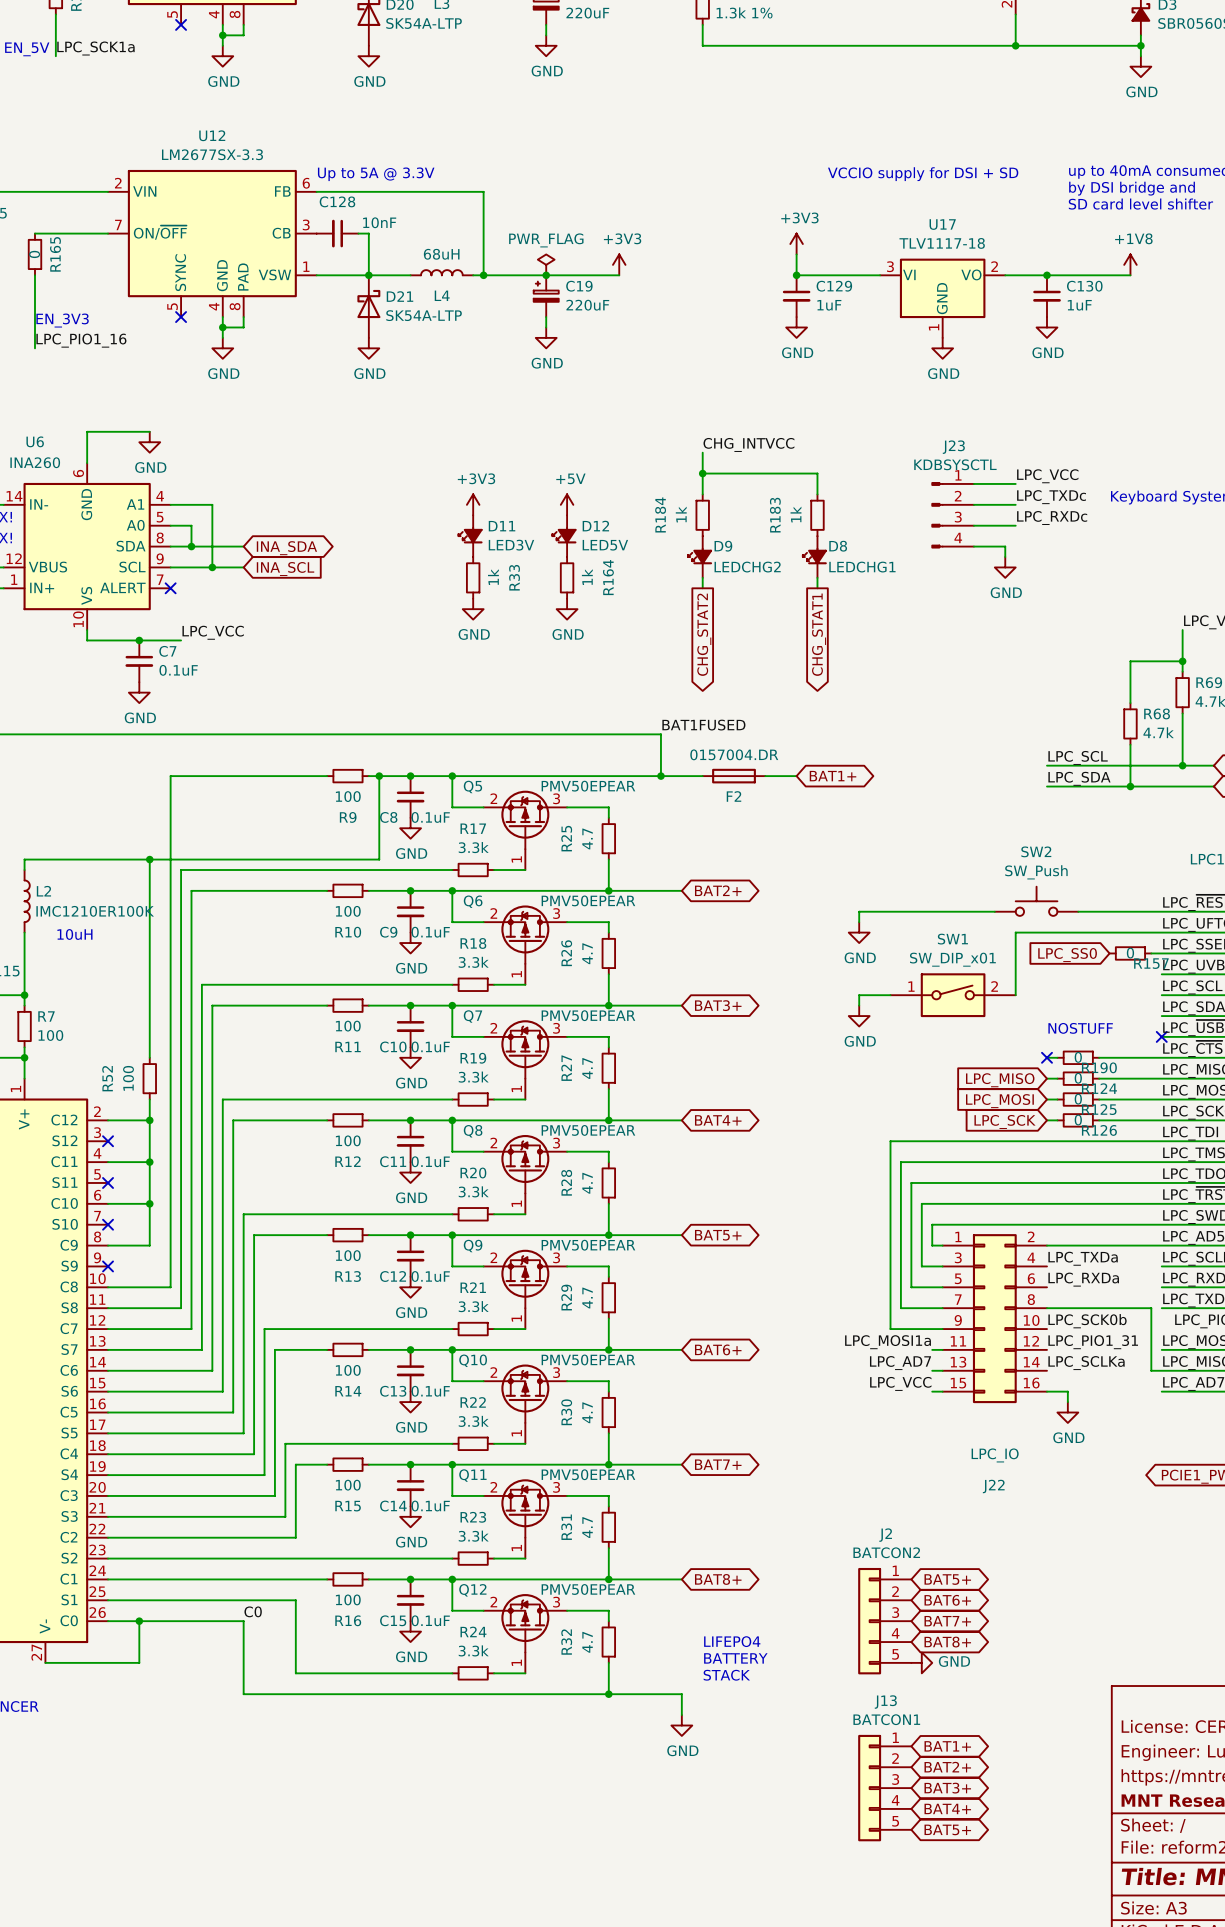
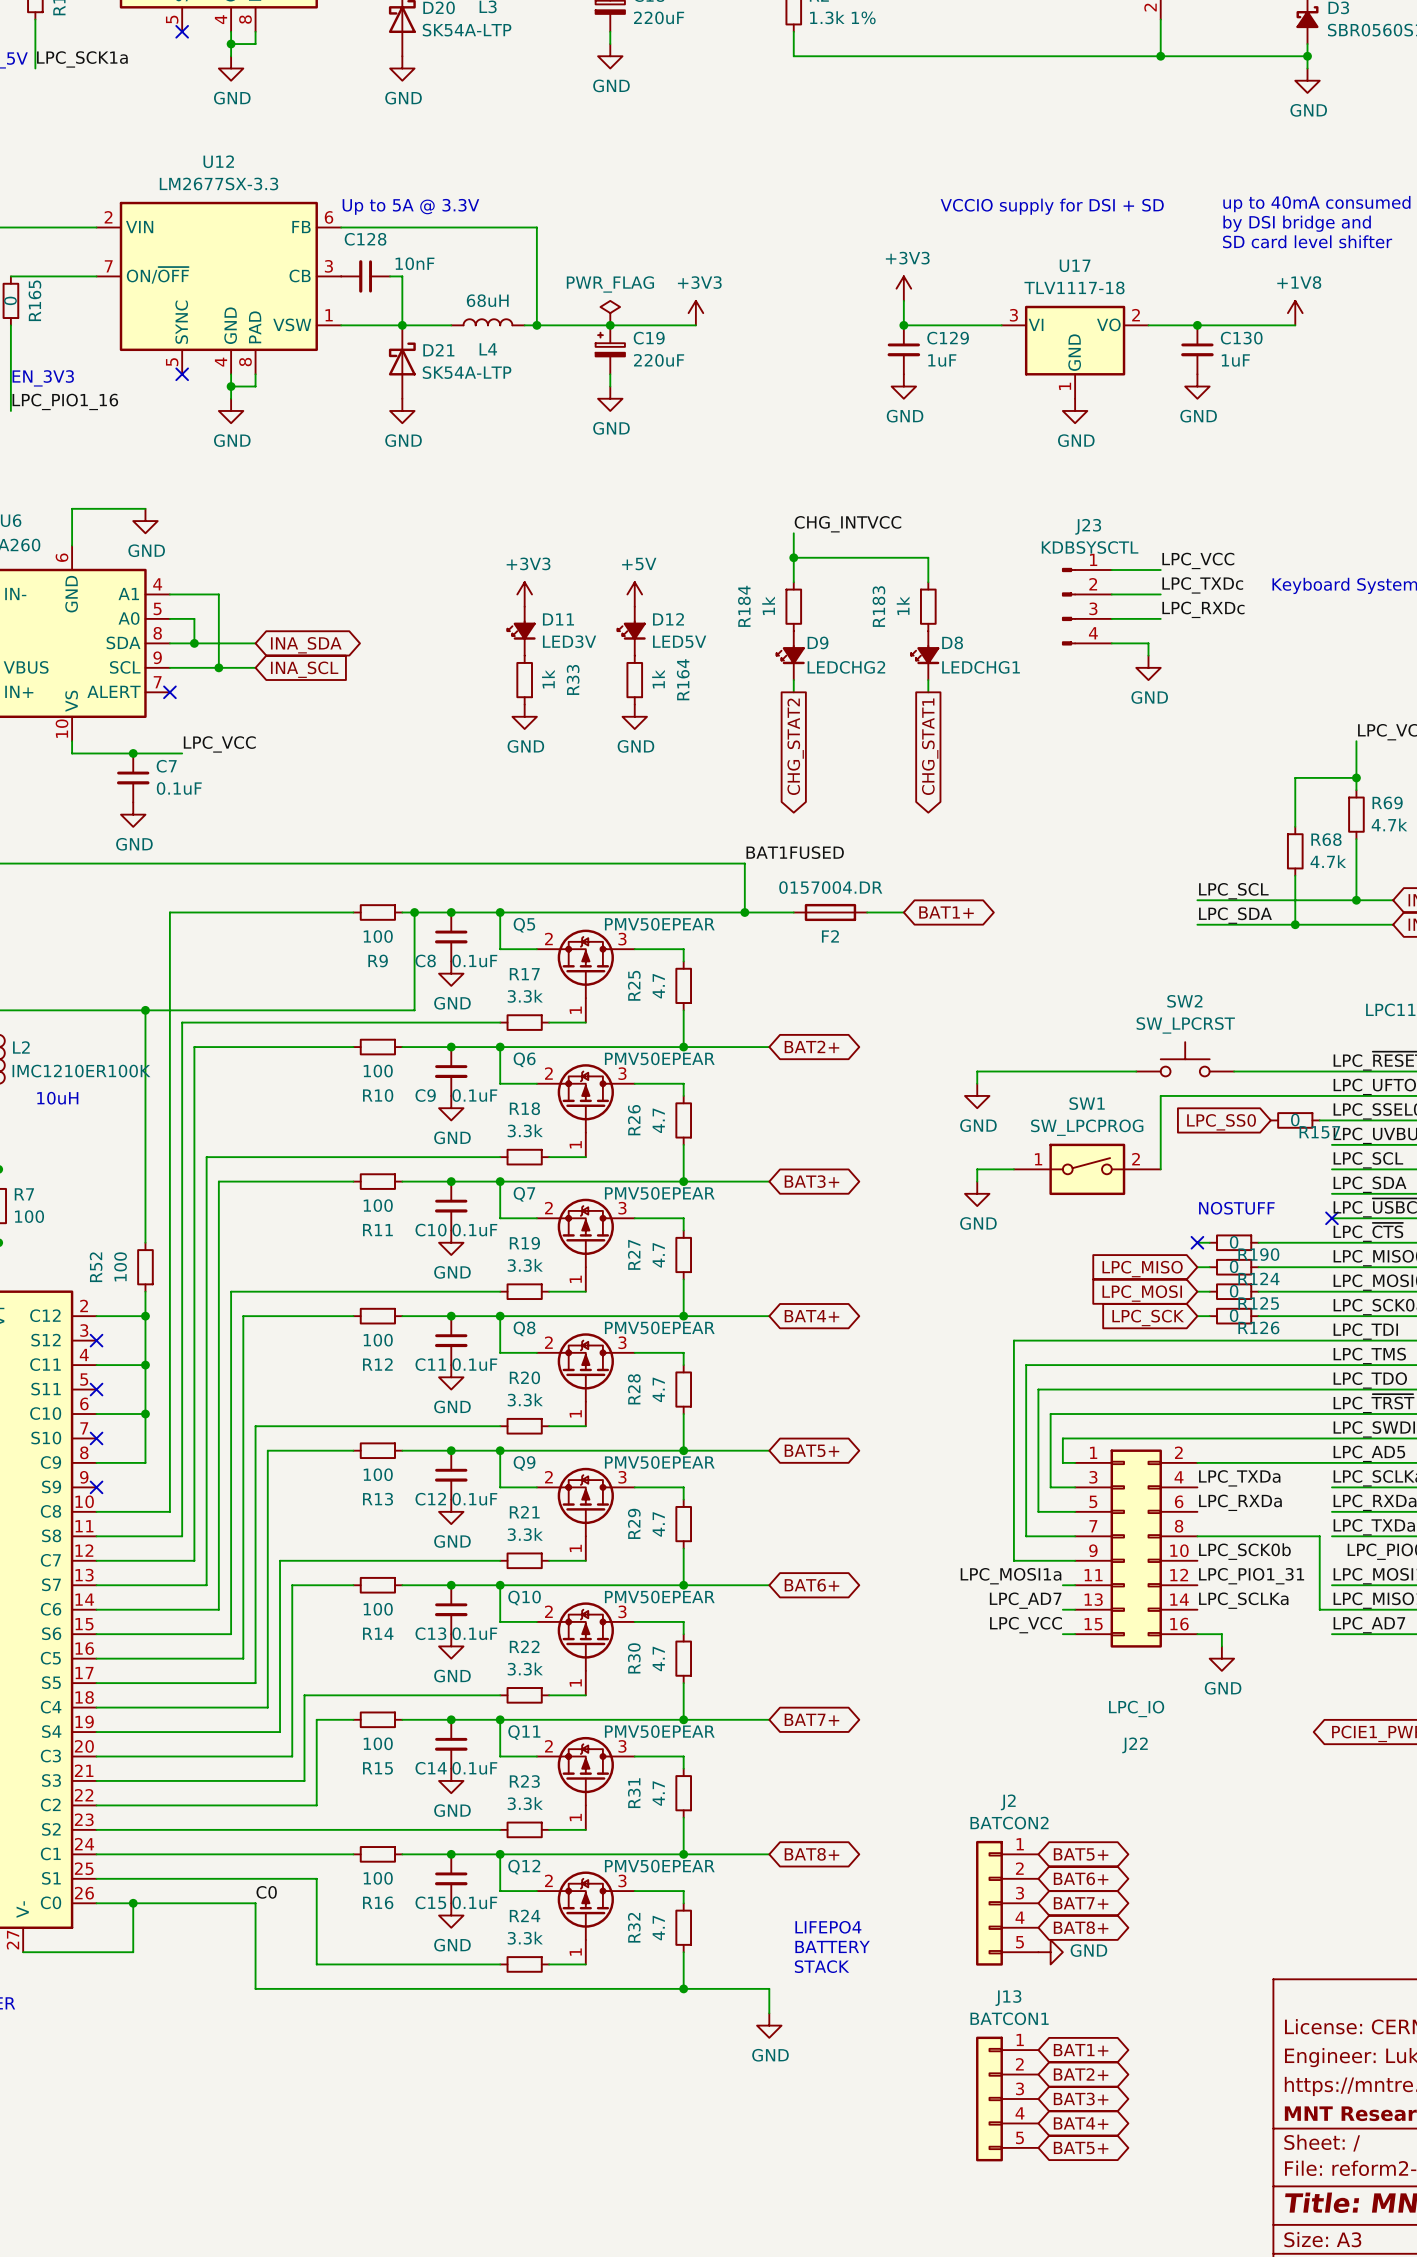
SW2 value: SW_Push (1036, 872) -> SW_LPCRST (1185, 1025)
SW1 value: SW_DIP_x01 (952, 959) -> SW_LPCPROG (1087, 1127)

